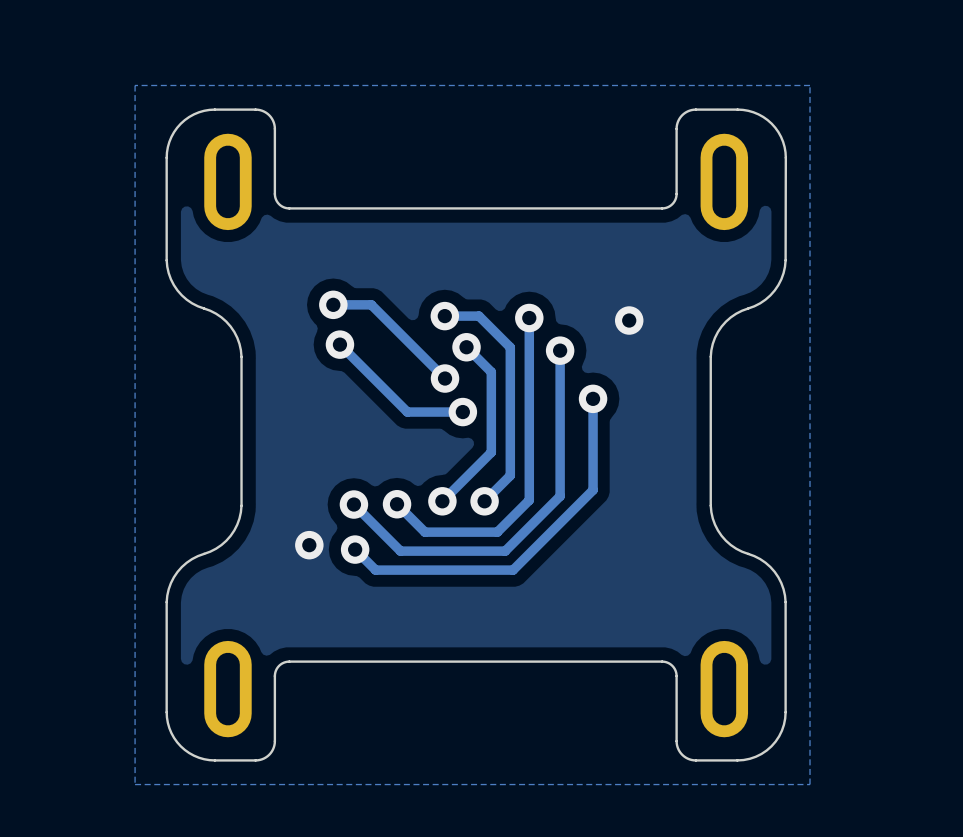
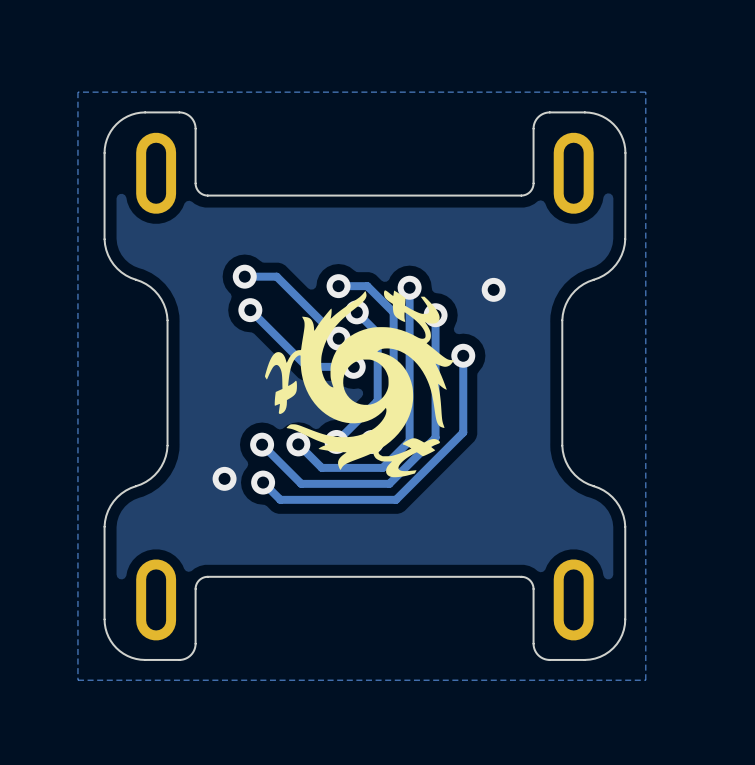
drawing: none -> [264, 290, 455, 478]

